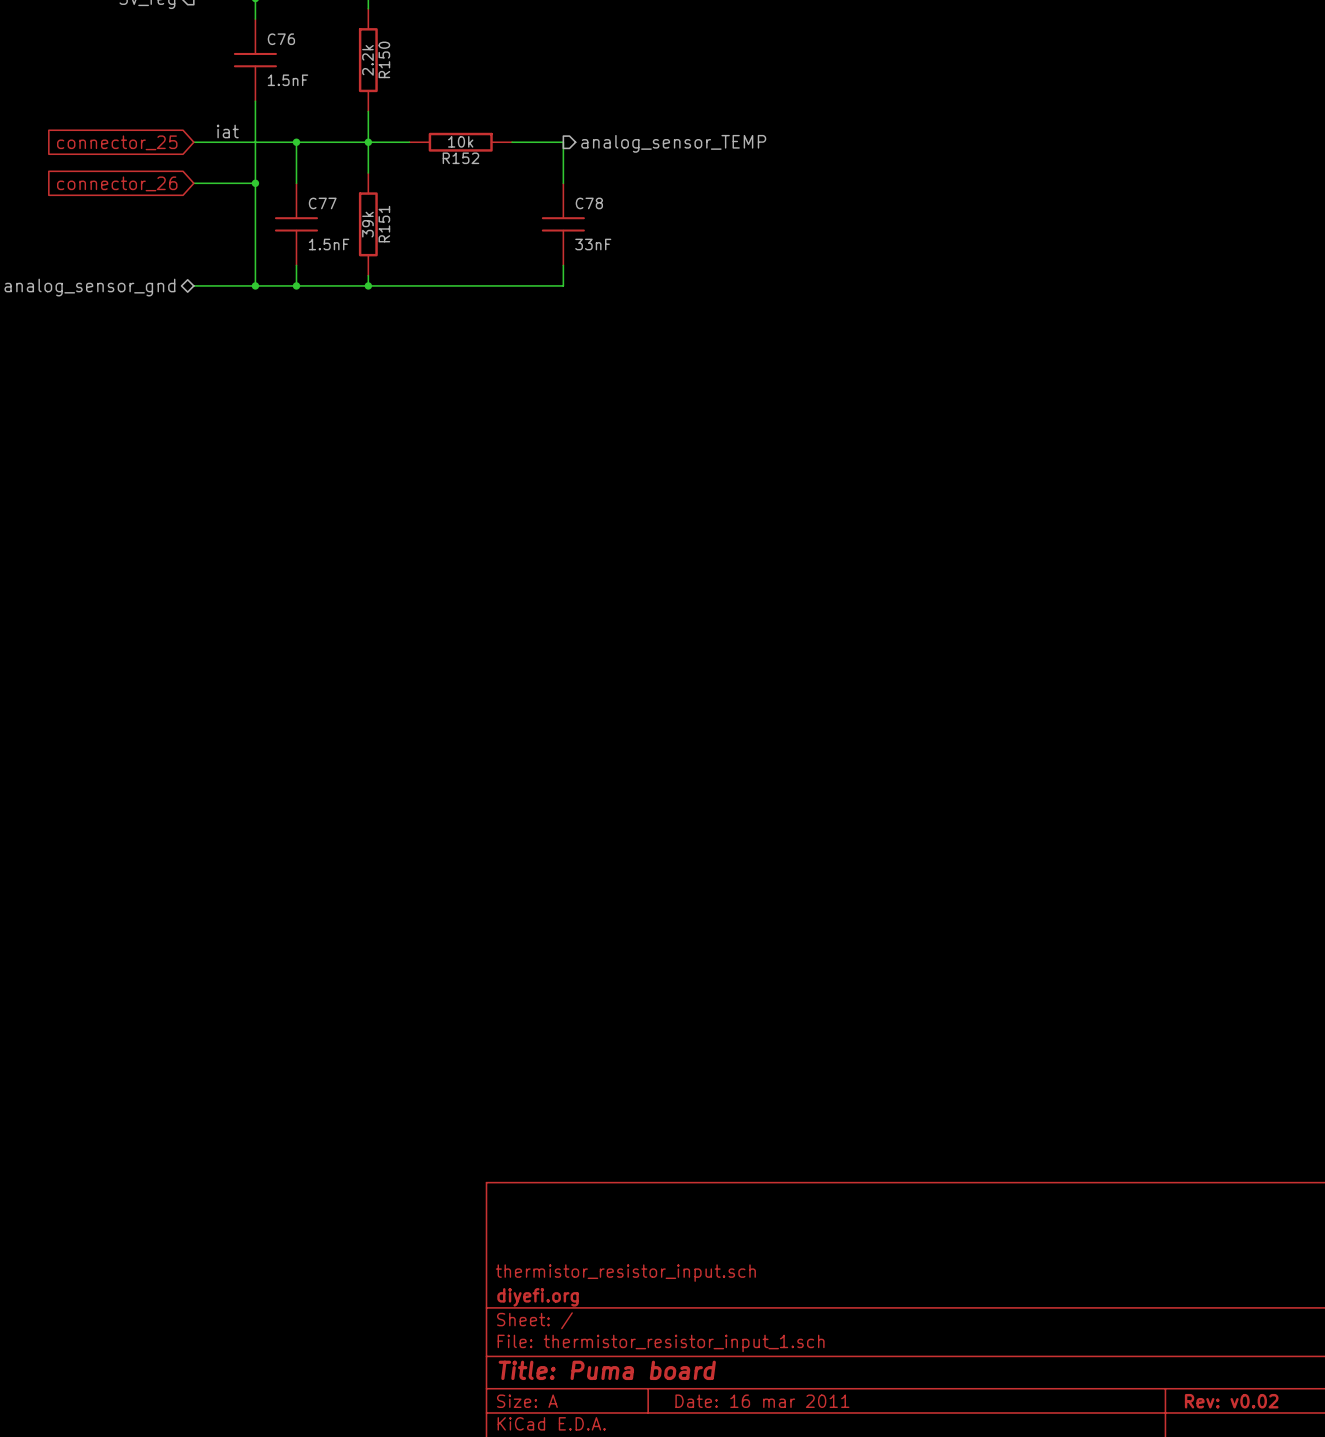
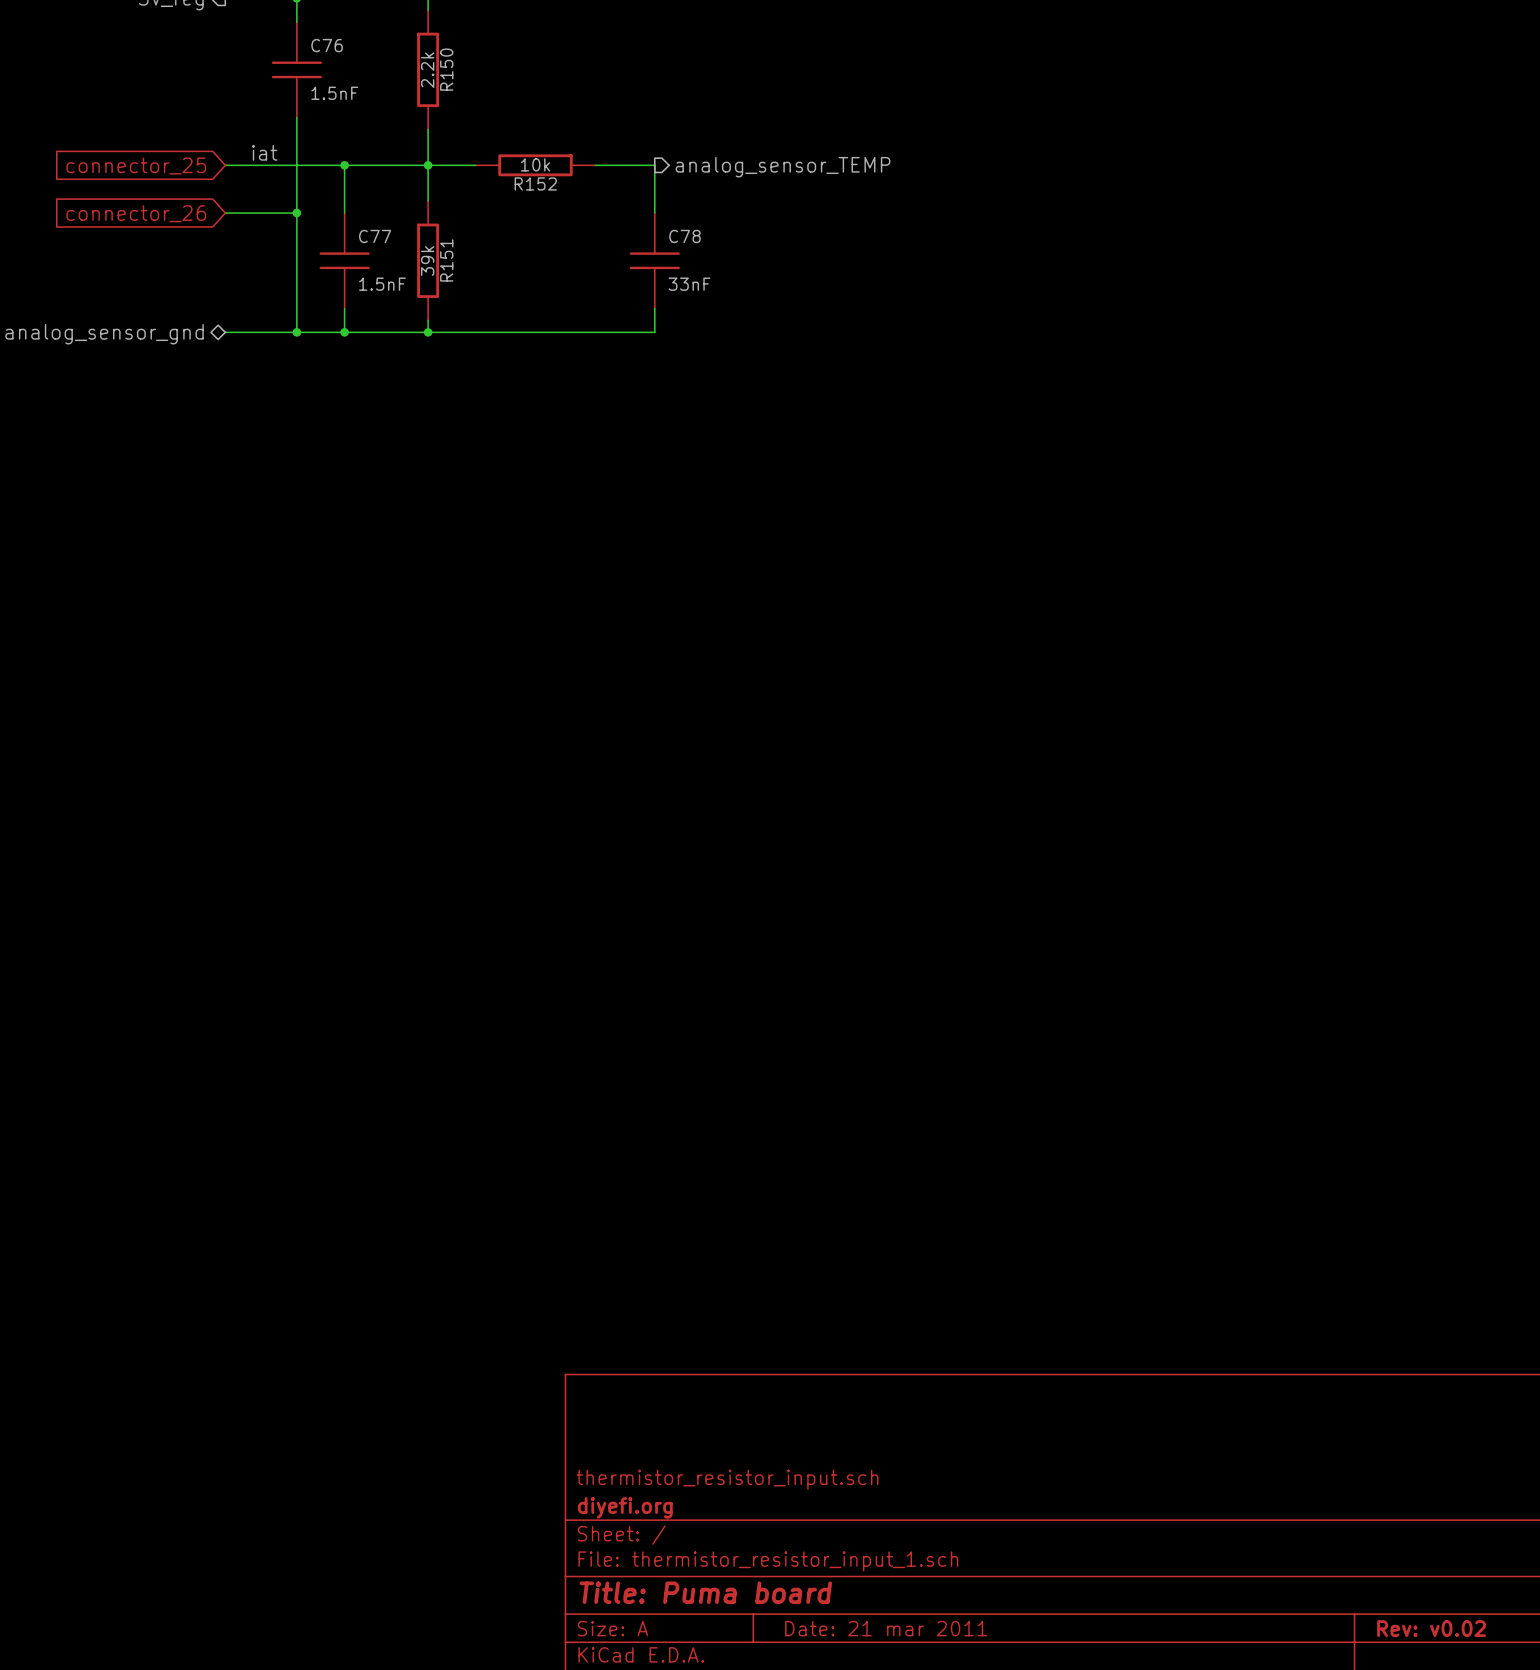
title block: Date: 16 mar 2011 (762, 1401) -> Date: 21 mar 2011 (886, 1628)

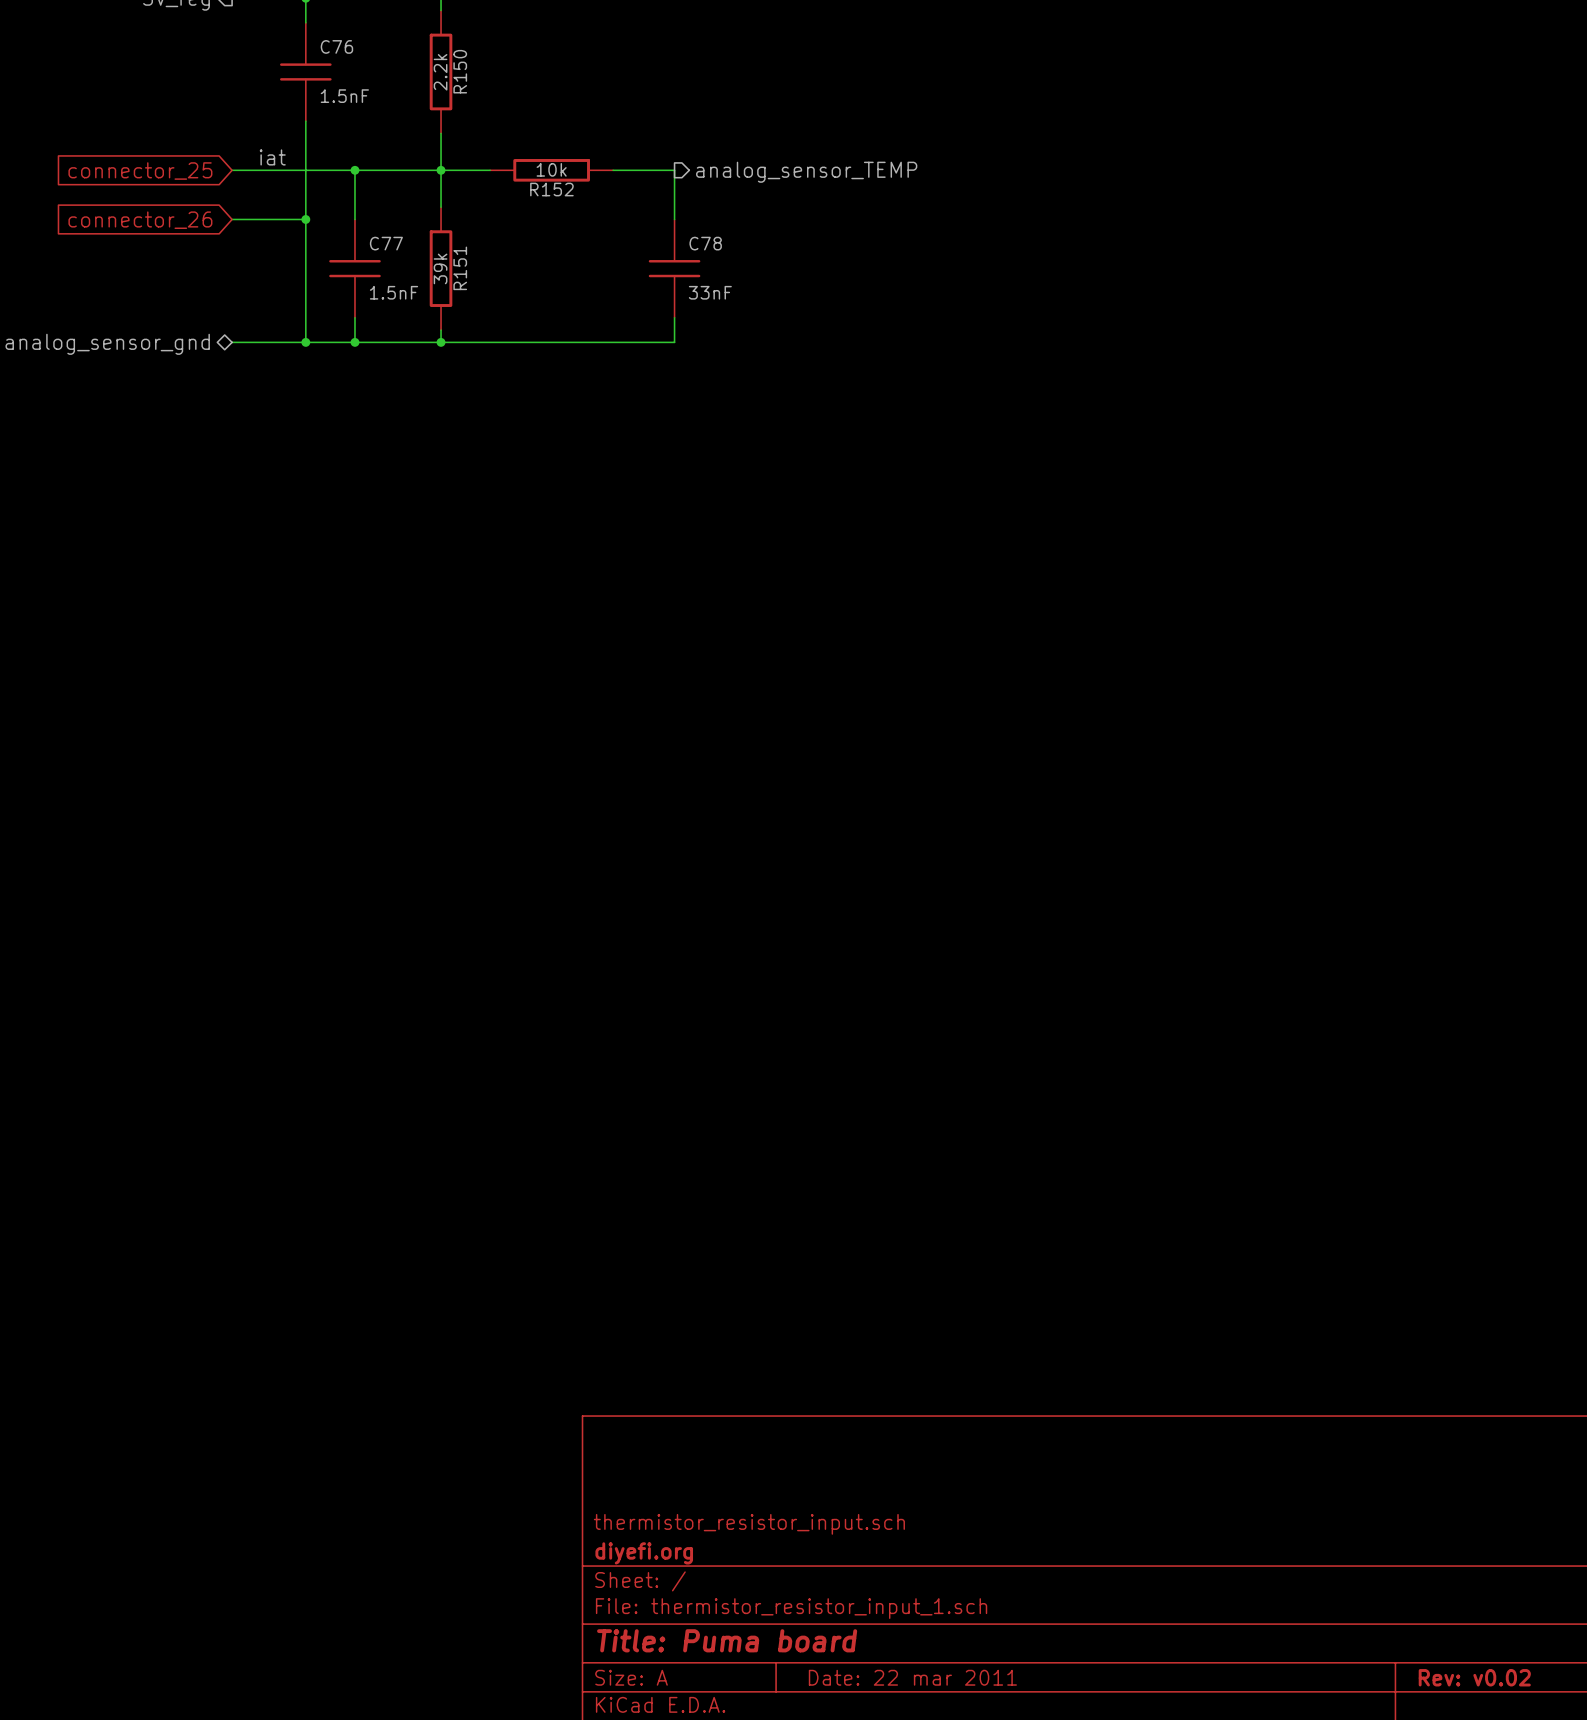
title block: Date: 21 mar 2011 (886, 1628) -> Date: 22 mar 2011 (912, 1677)

